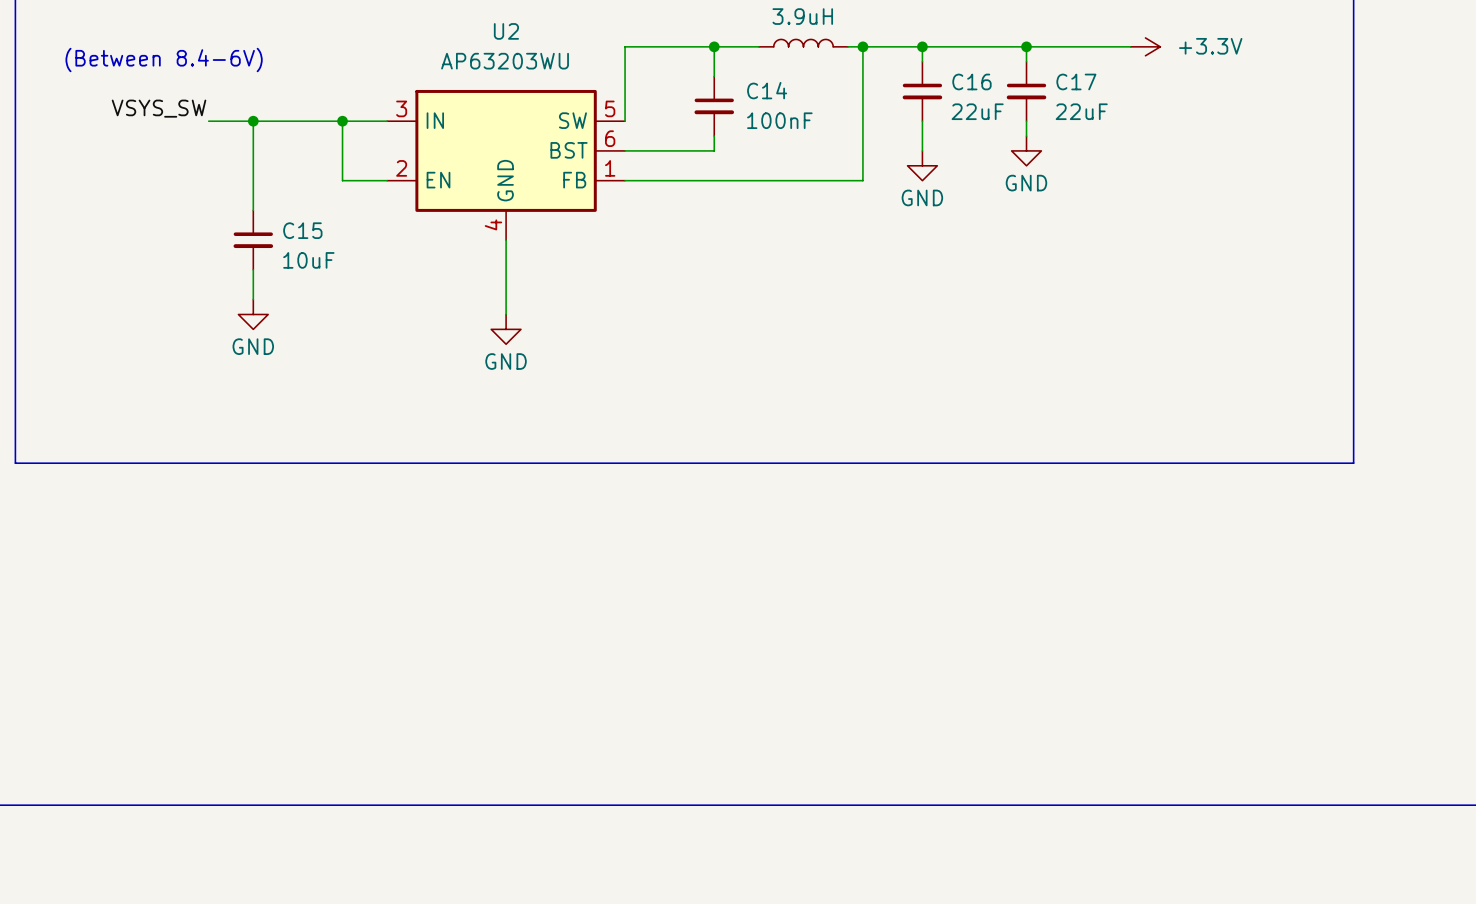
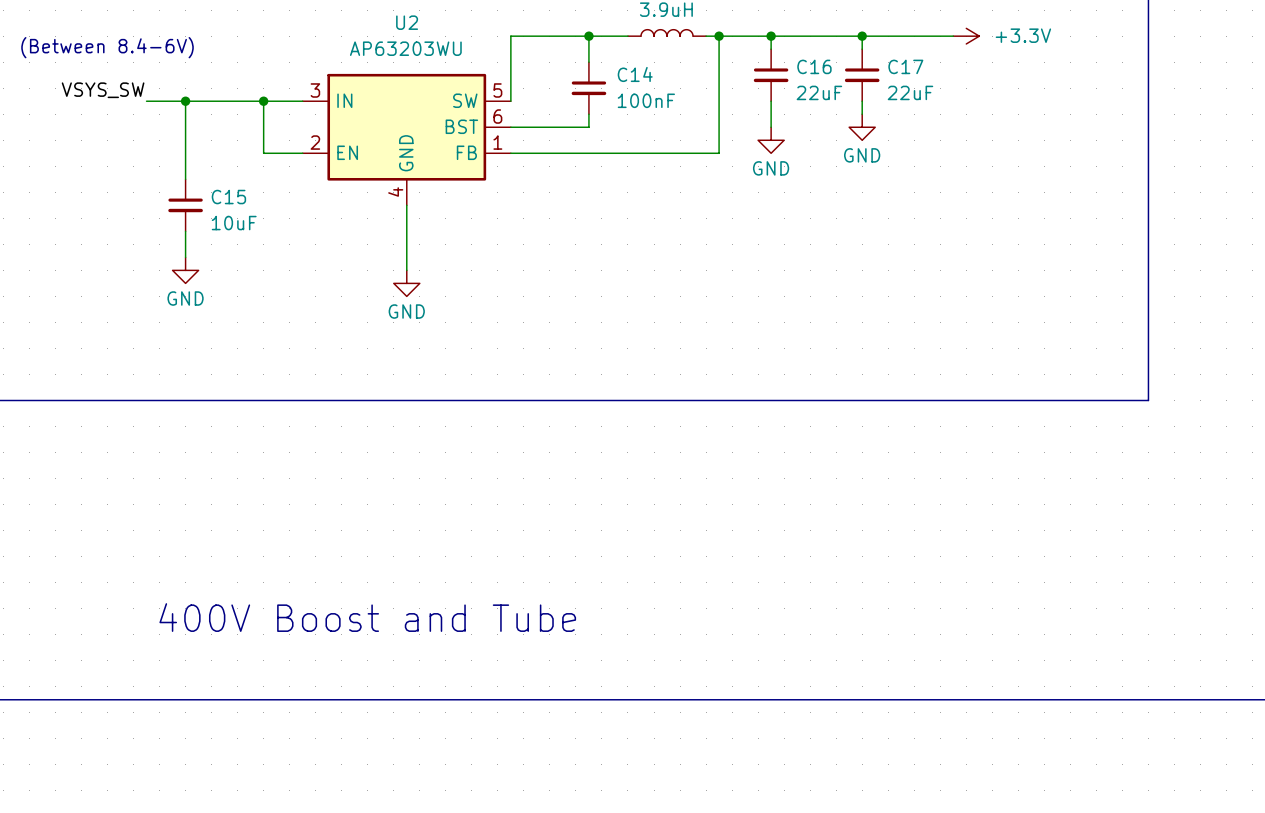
text: none -> 400V Boost and Tube (367, 617)

